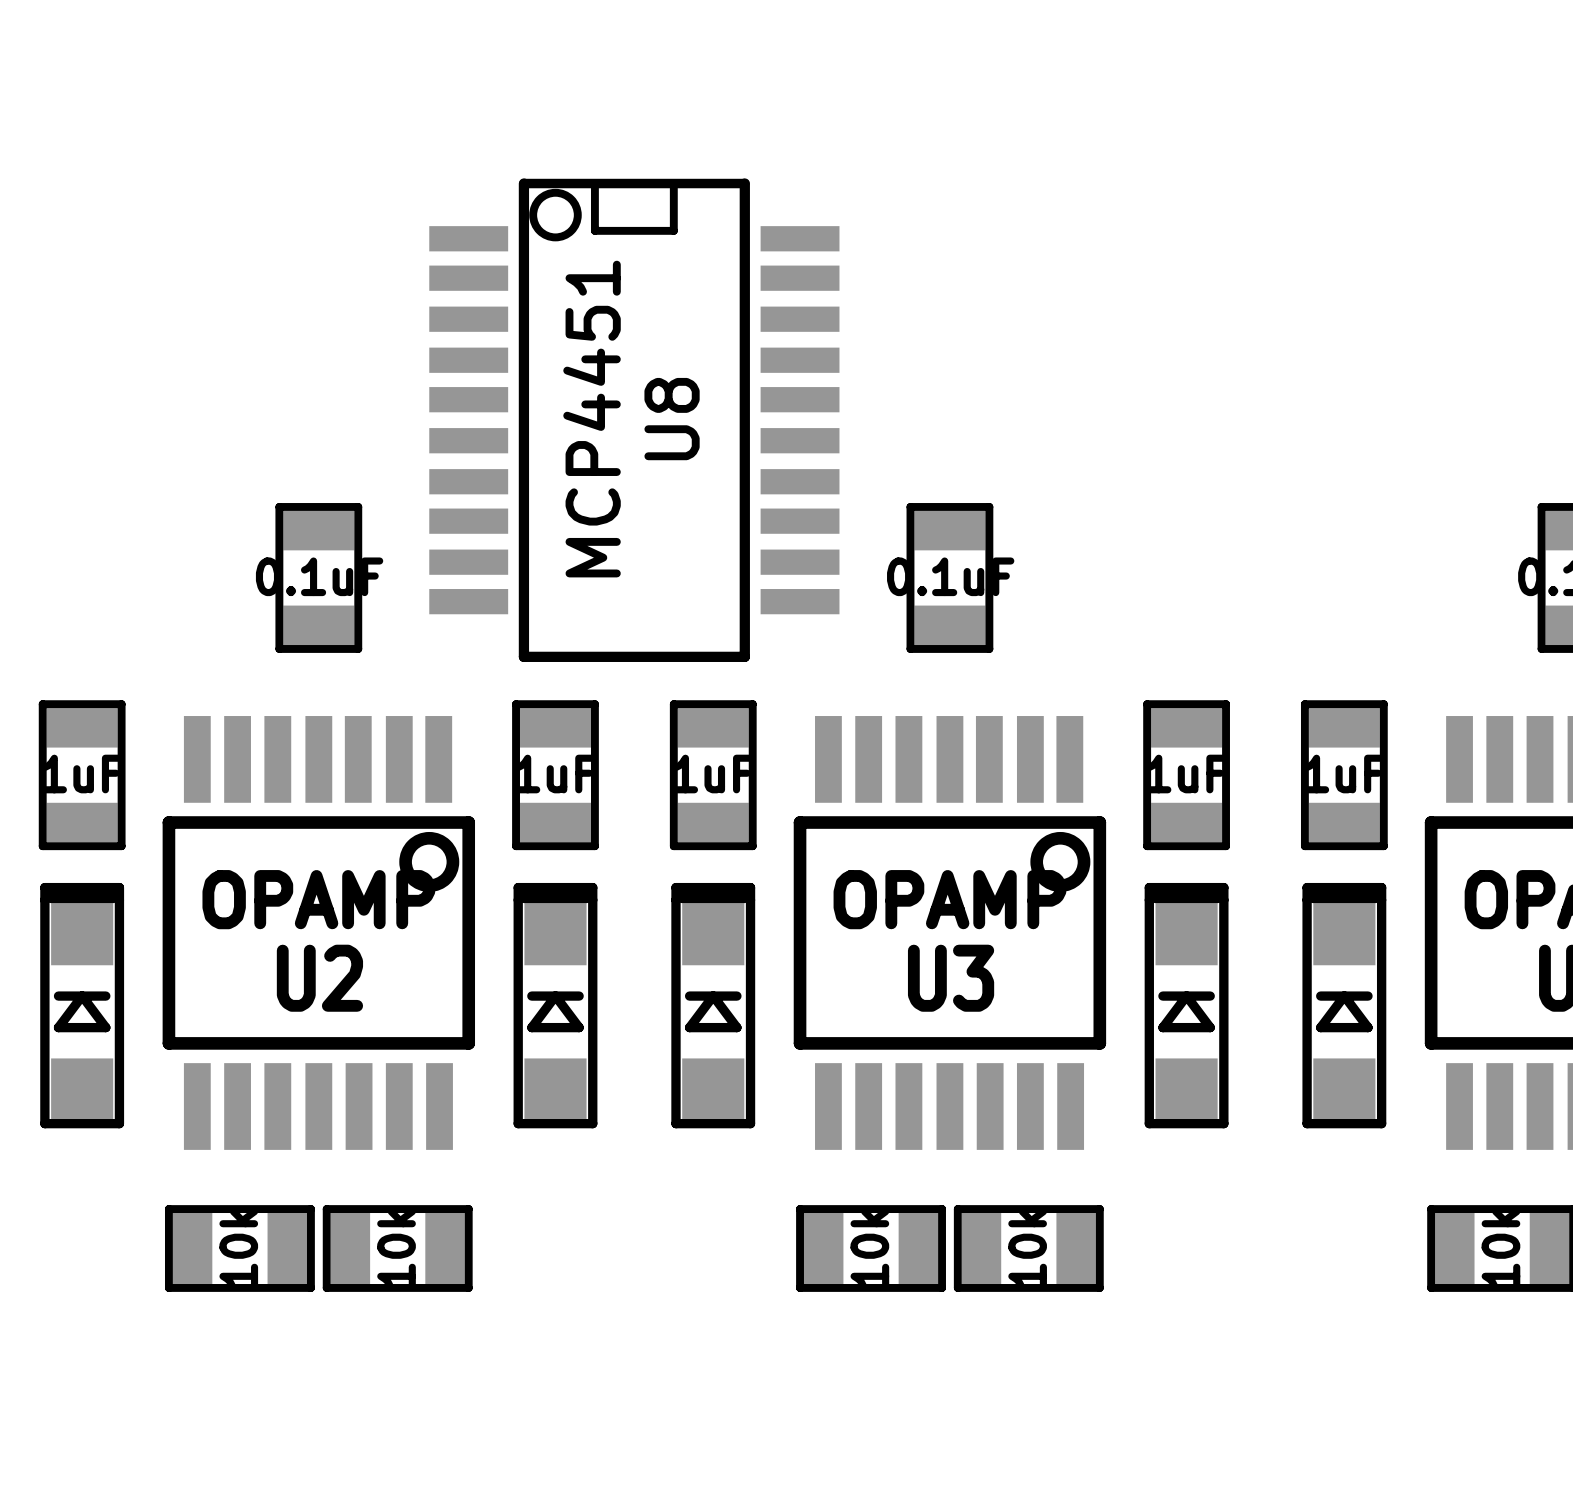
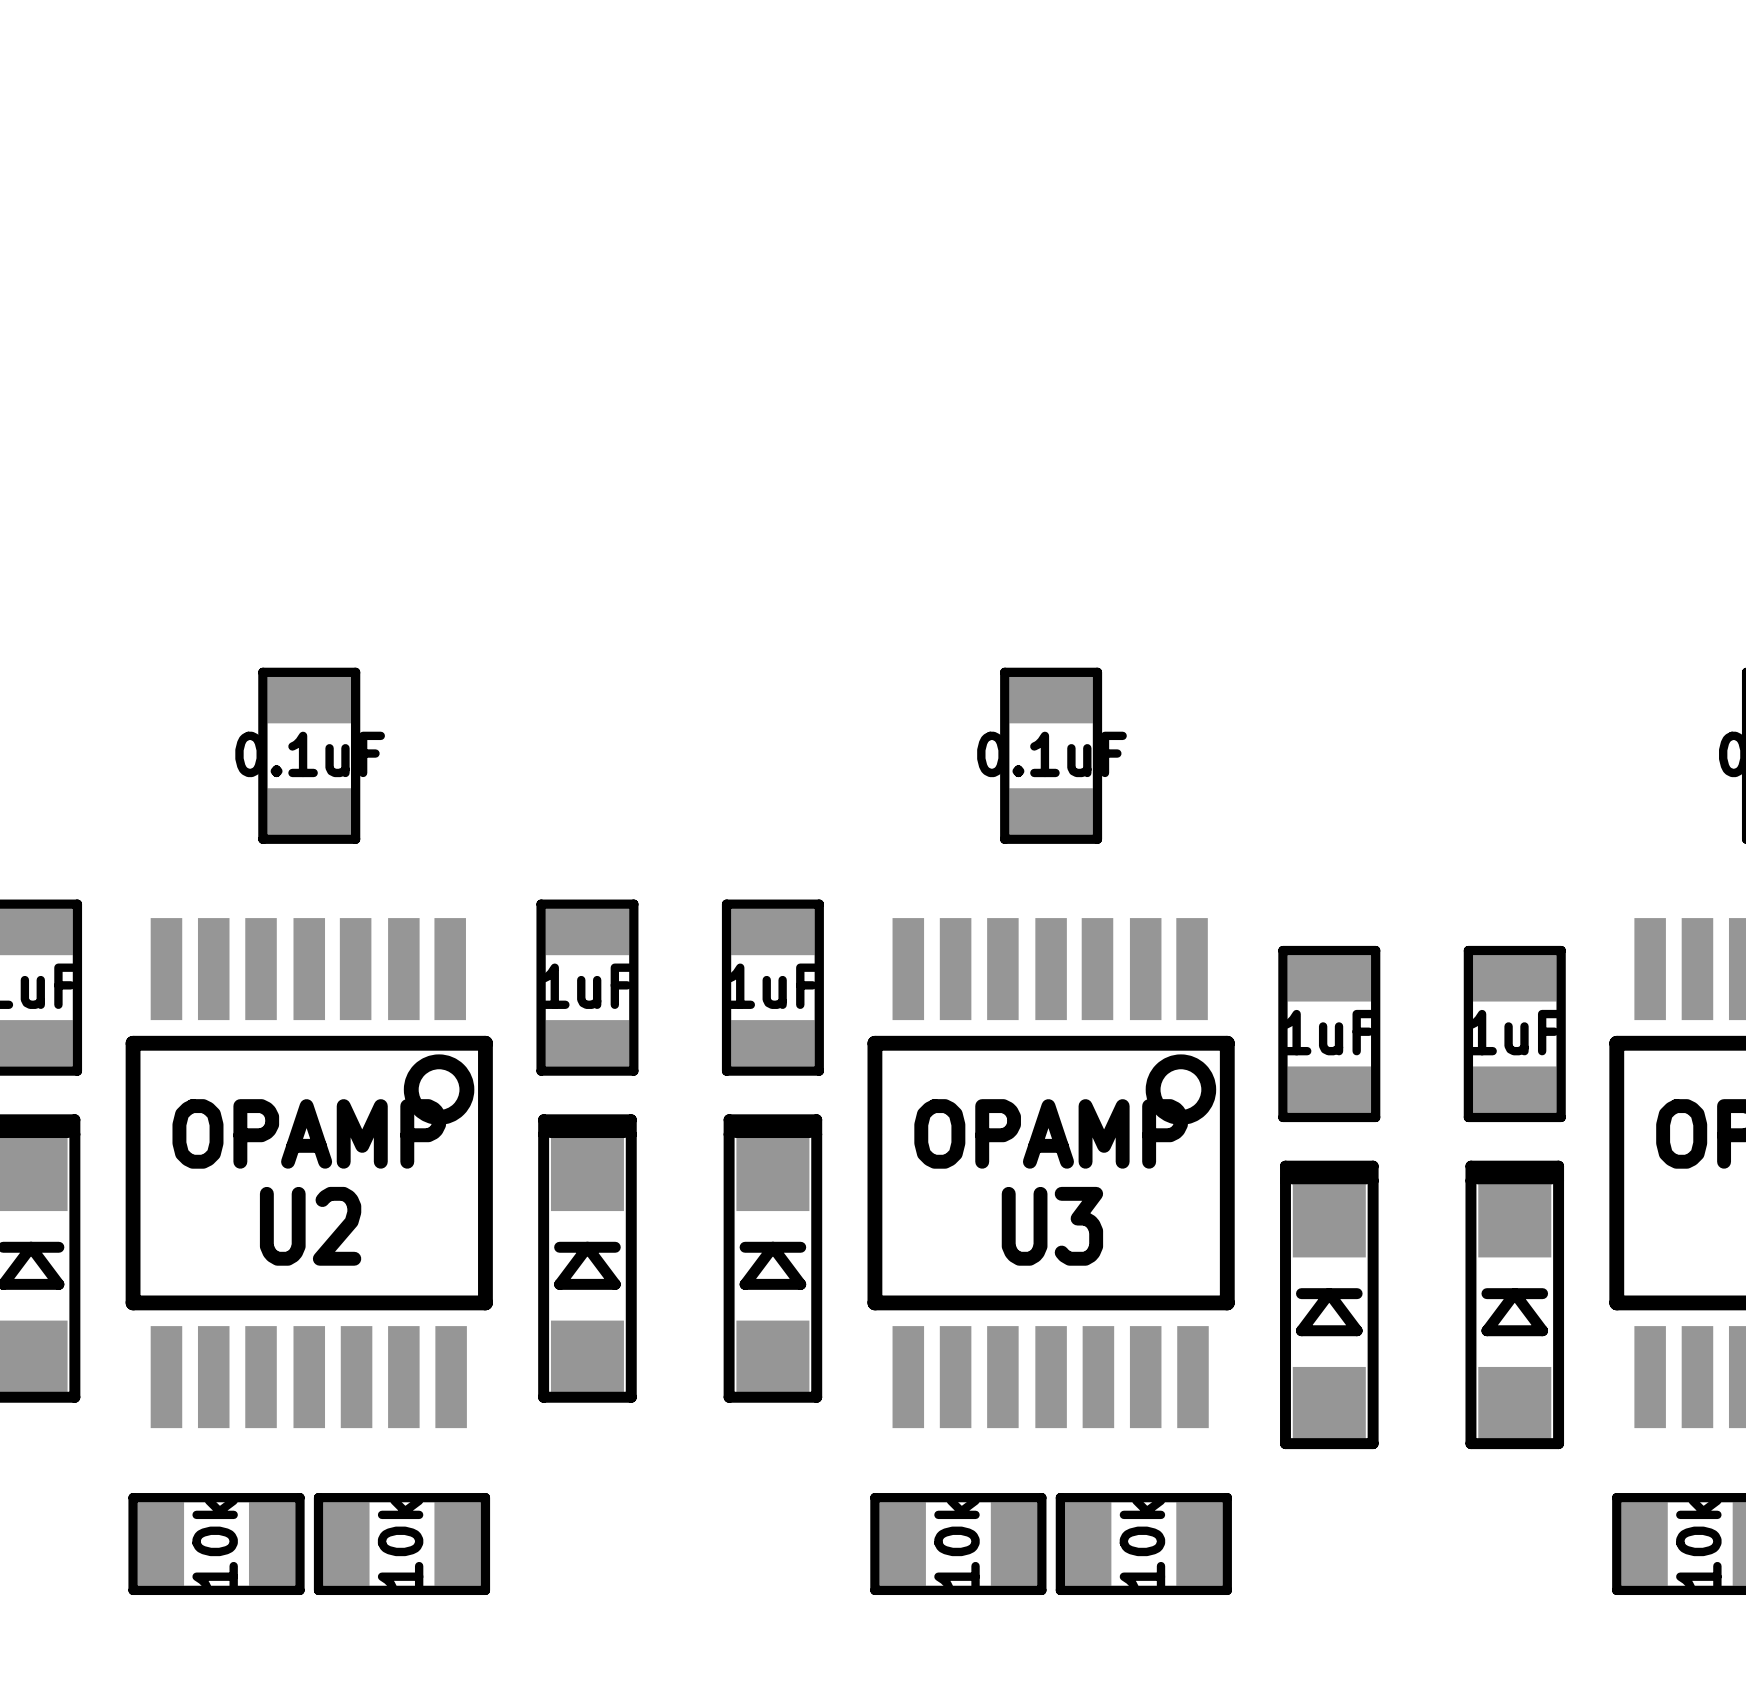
U8: MCP4451 (634, 420) -> none
part position: (1186, 775) -> (1329, 1033)
part position: (1344, 775) -> (1514, 1033)
part position: (1186, 1005) -> (1329, 1304)
part position: (1344, 1005) -> (1514, 1304)

